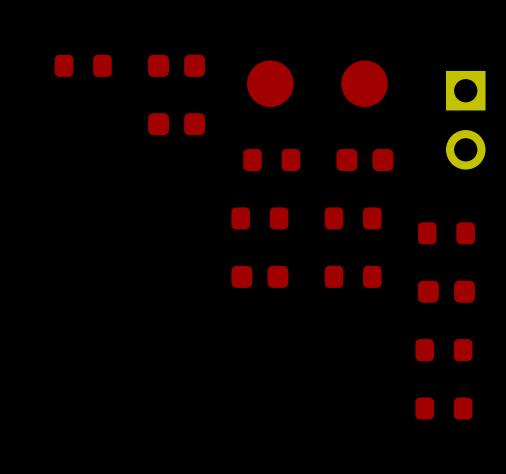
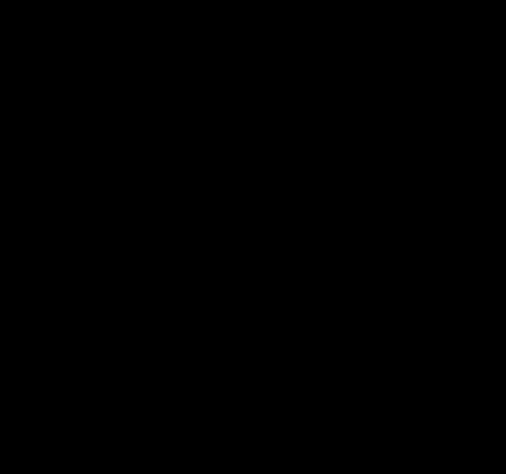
part: (83, 65) -> none
part: (176, 65) -> none
part: (270, 83) -> none
part: (364, 83) -> none
part: (465, 120) -> none
part: (176, 124) -> none
part: (271, 160) -> none
part: (365, 160) -> none
part: (259, 218) -> none
part: (353, 218) -> none
part: (446, 233) -> none
part: (259, 276) -> none
part: (353, 276) -> none
part: (446, 291) -> none
part: (443, 350) -> none
part: (443, 408) -> none

